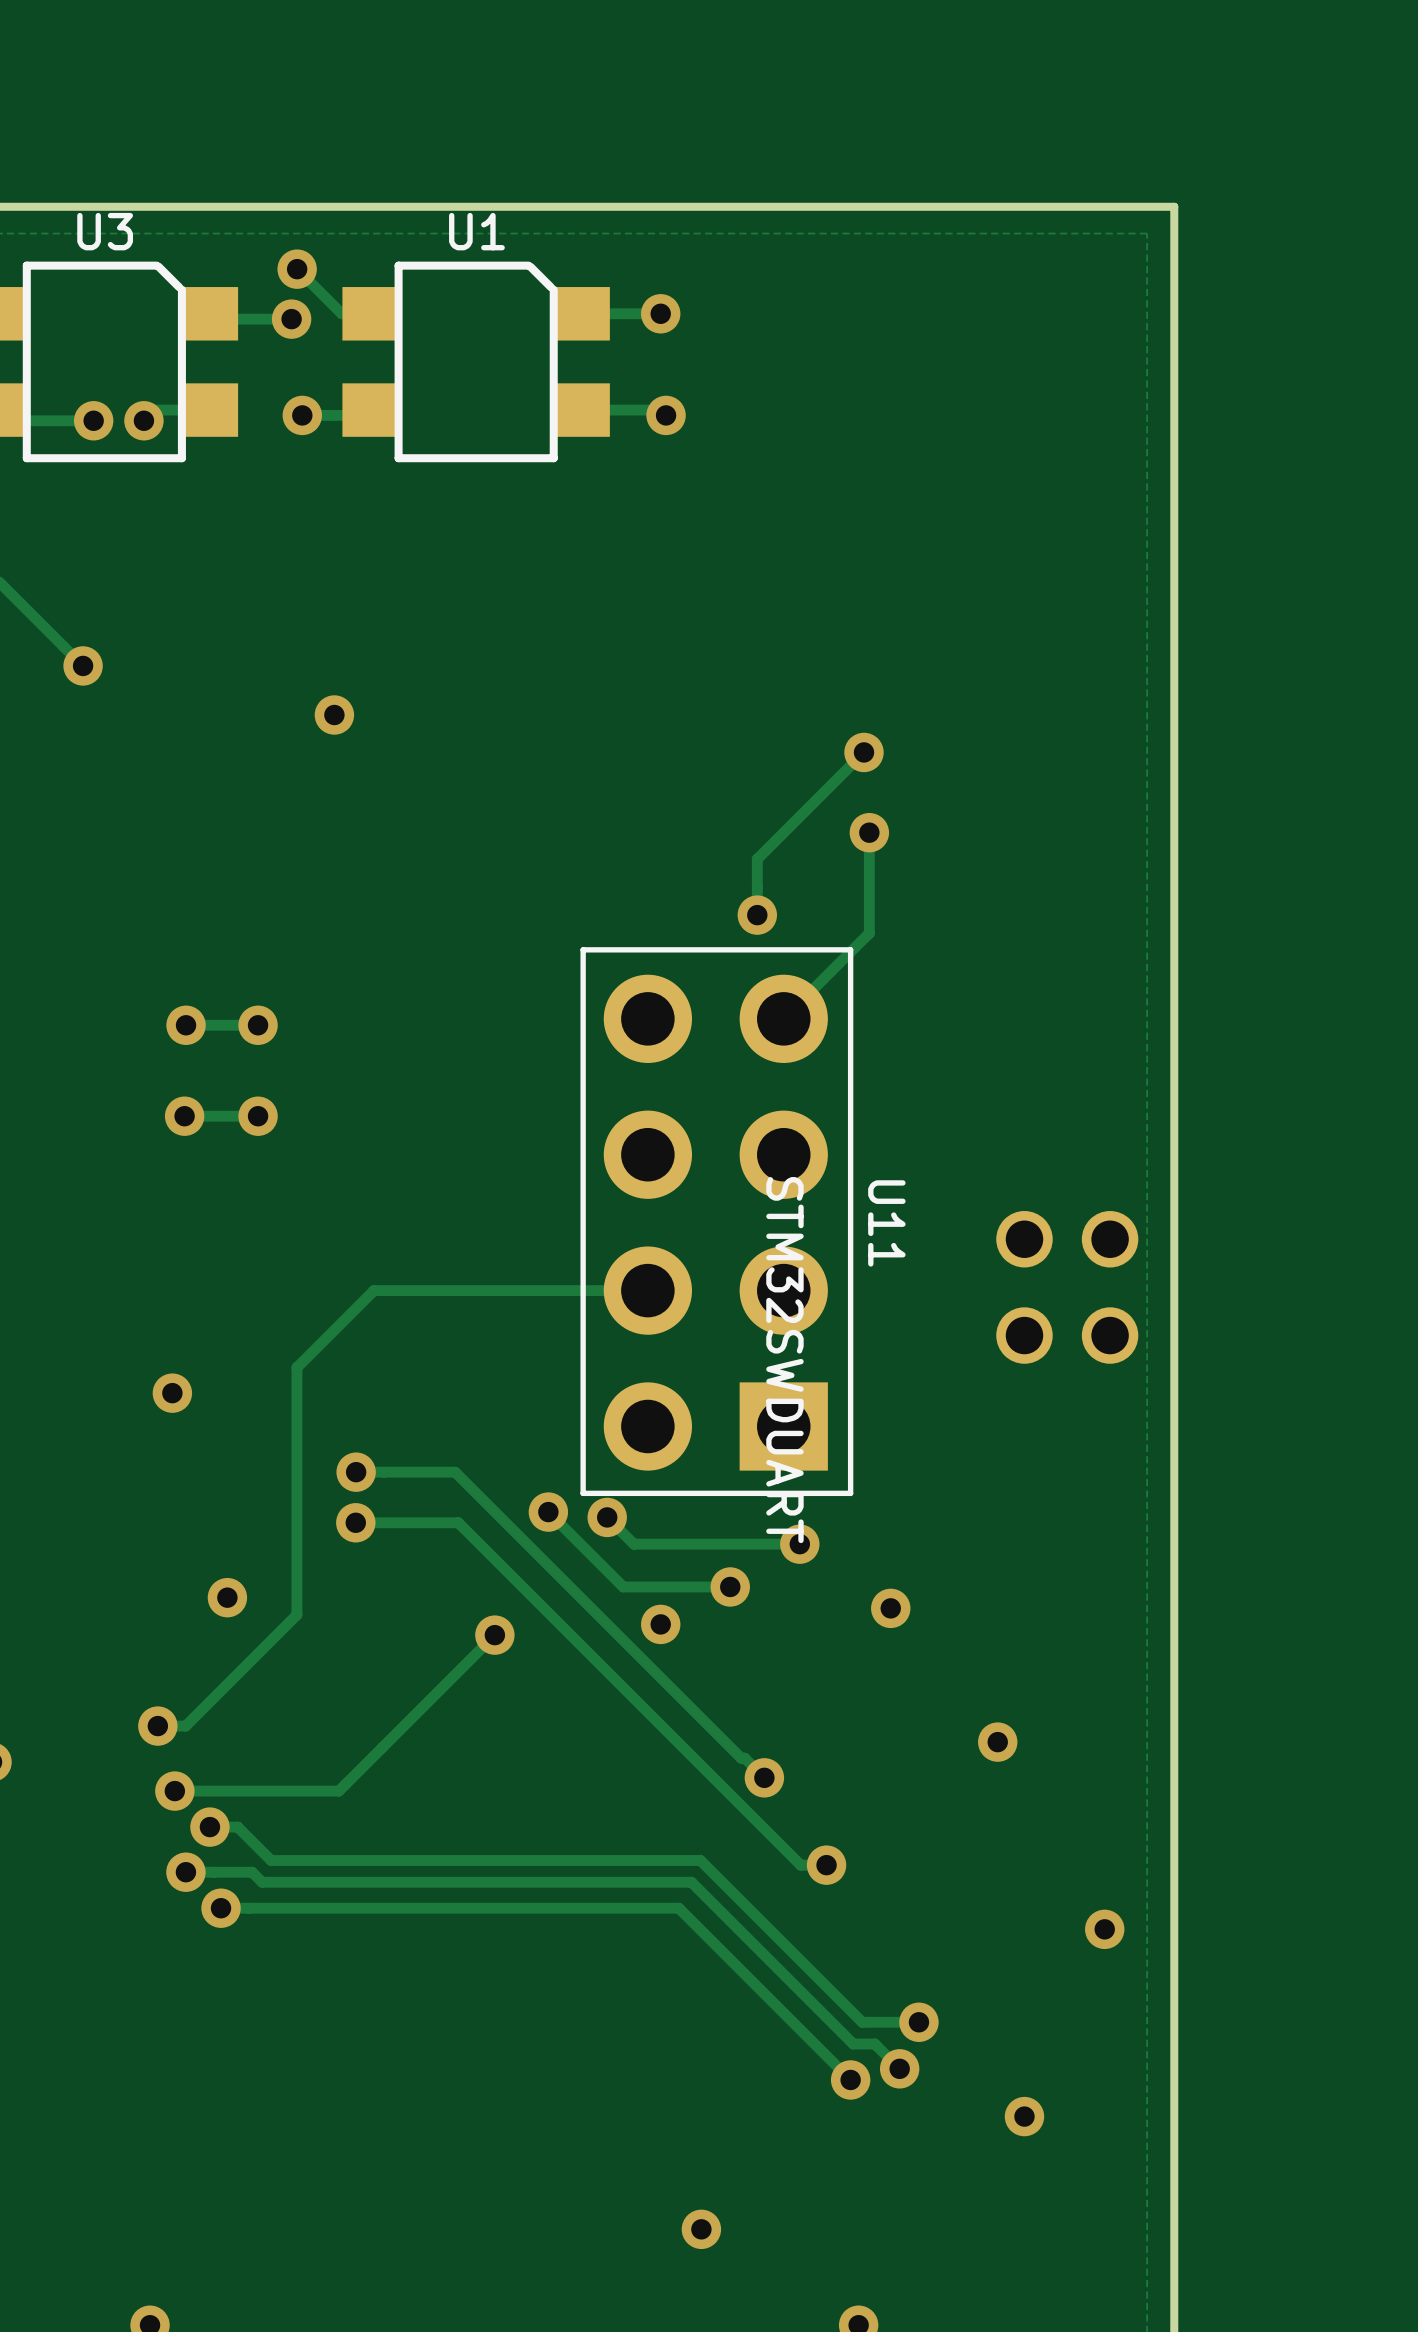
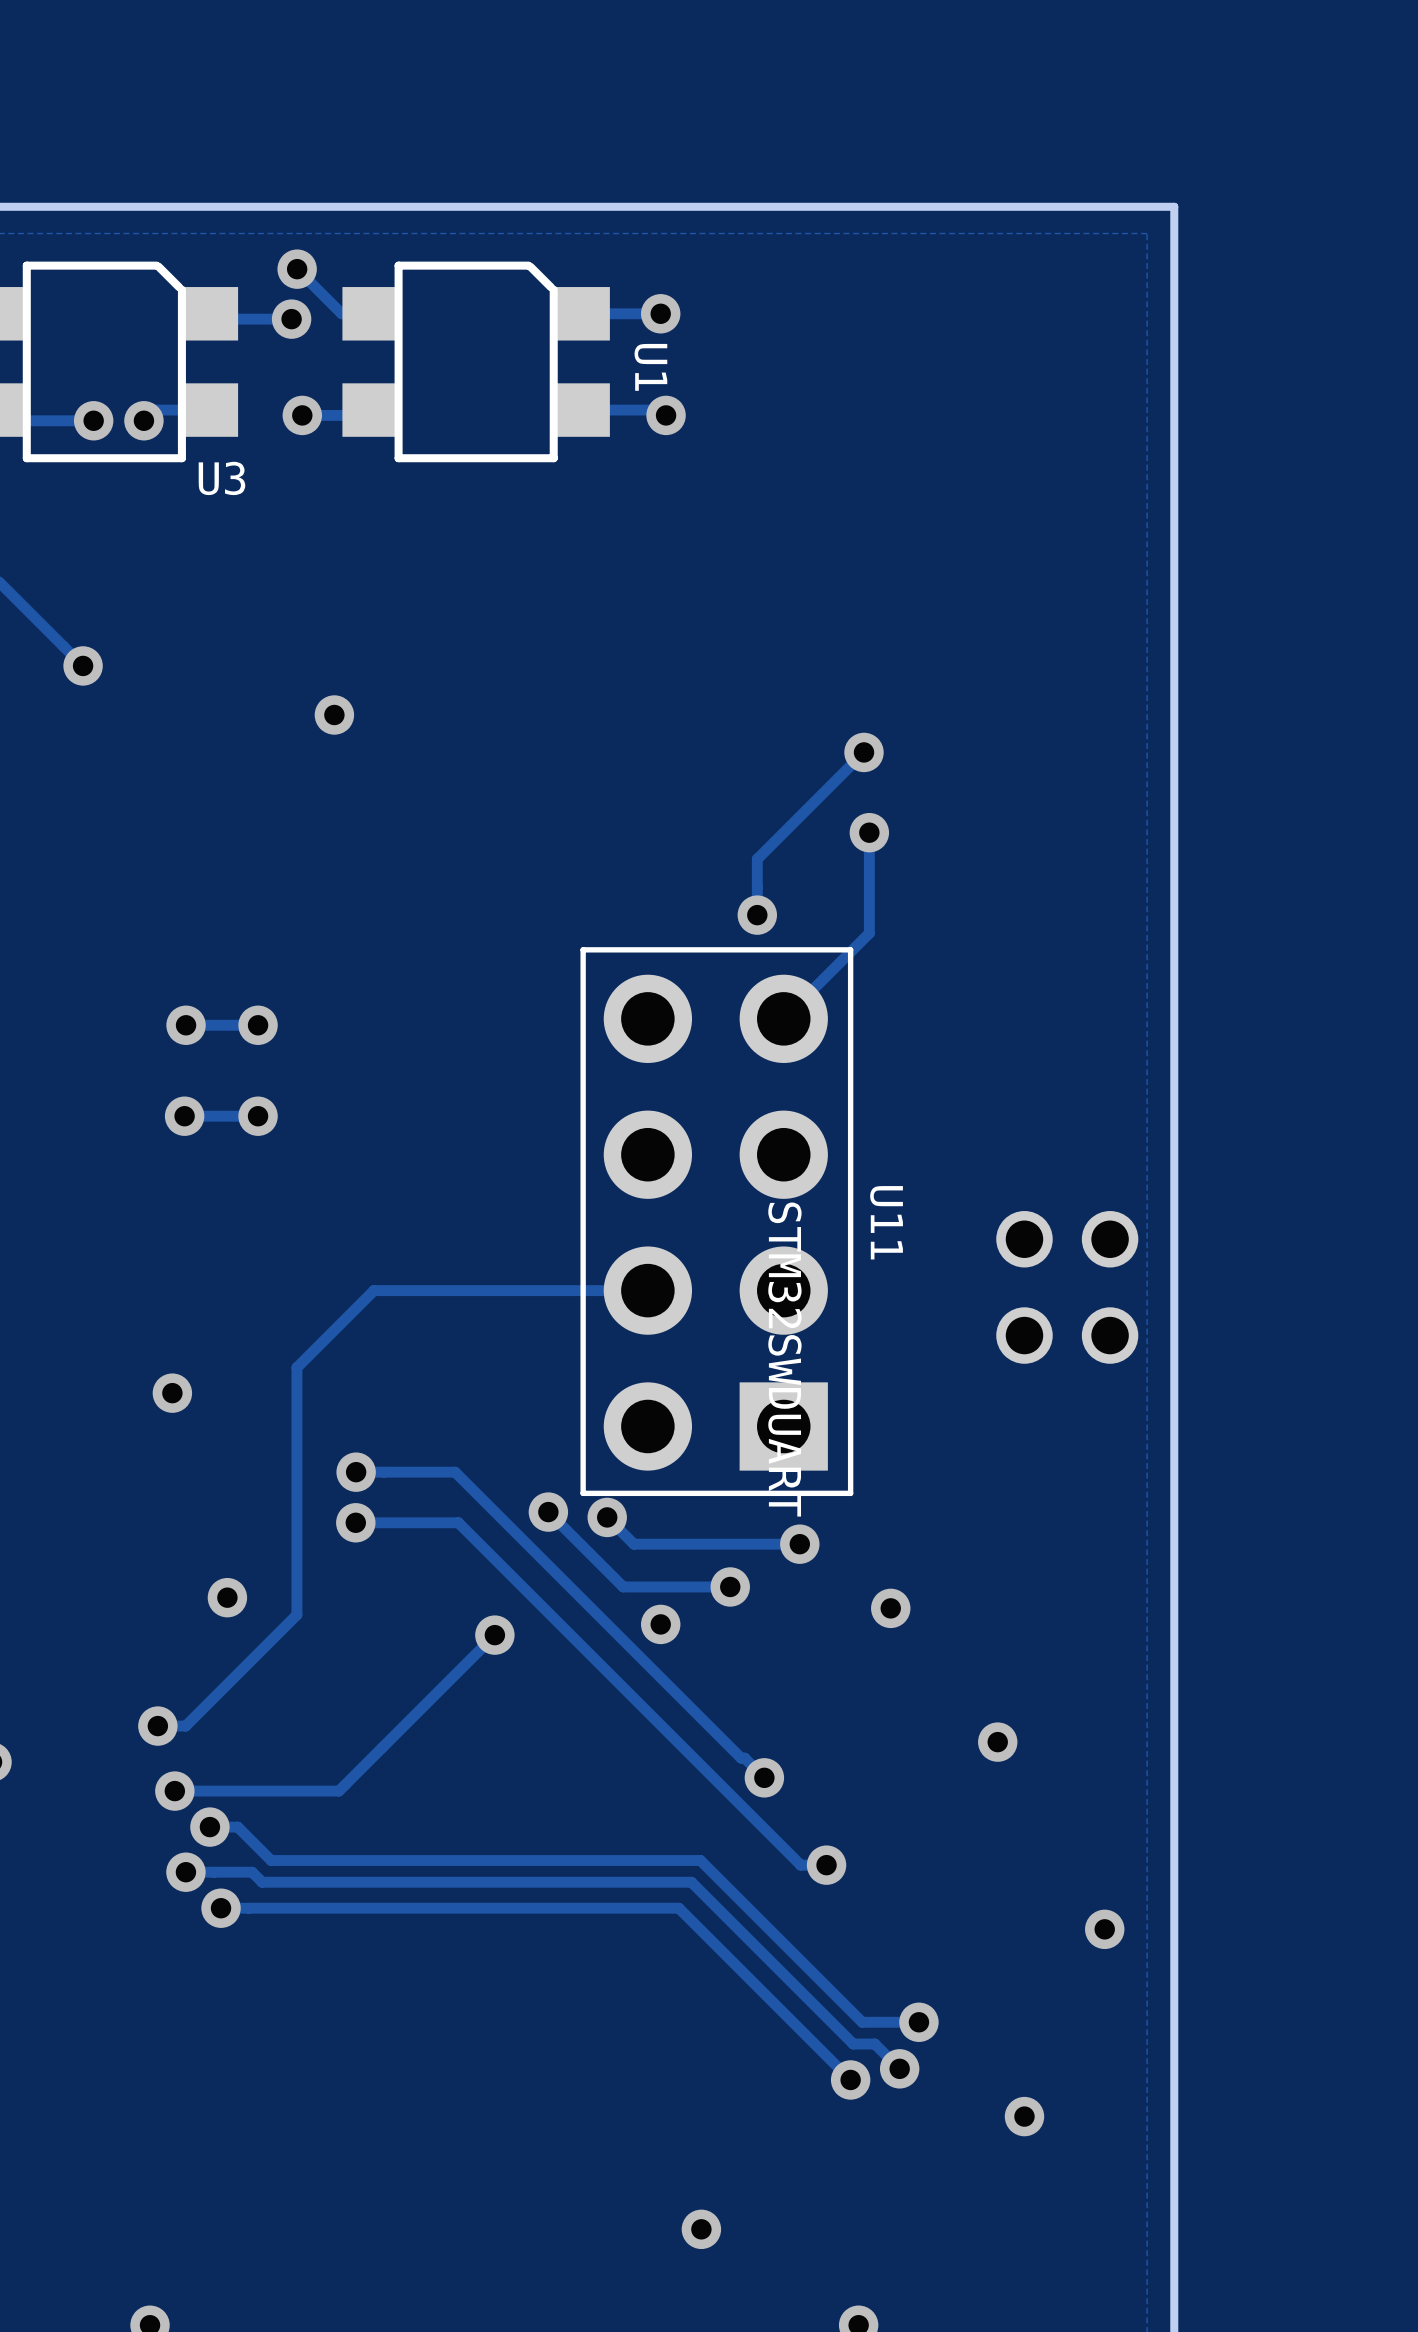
U3 name position: U3 (105, 231) -> U3 (221, 478)
U1 name rotation: 0° (476, 231) -> 90° clockwise (650, 367)
U1 name position: U1 (476, 231) -> U1 (650, 367)

